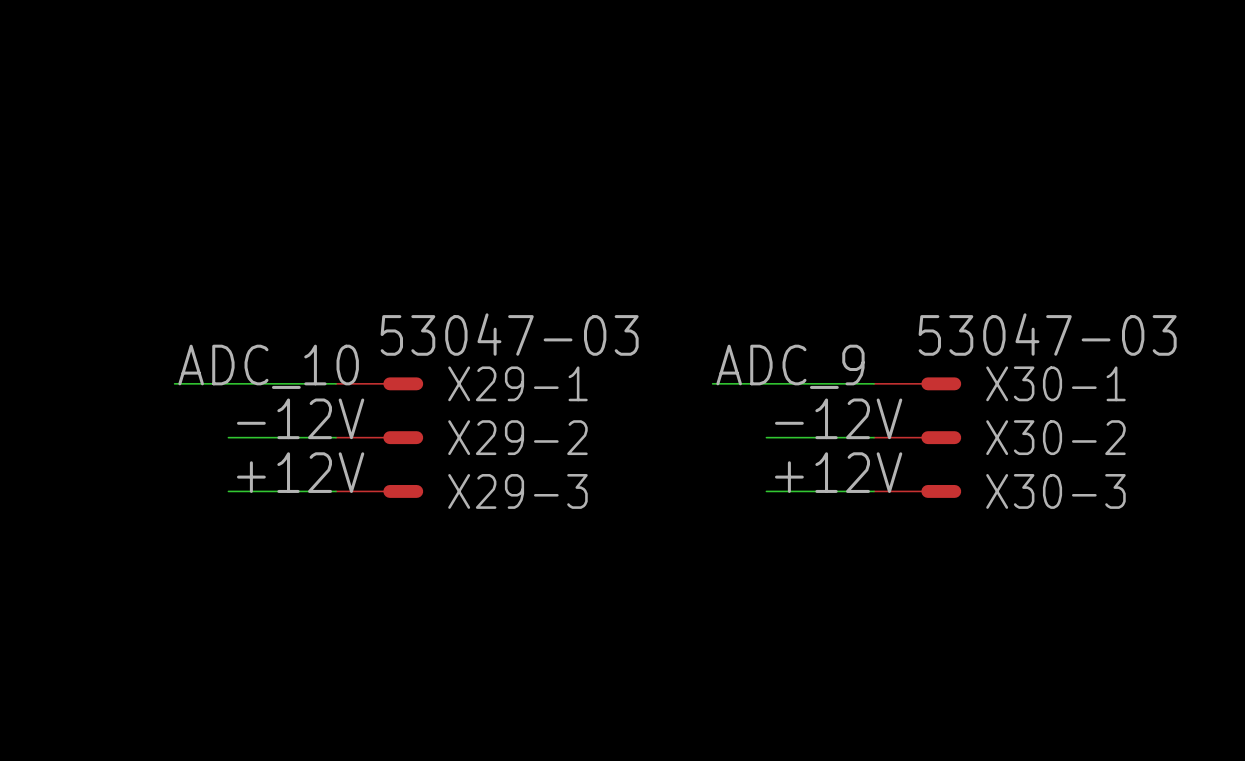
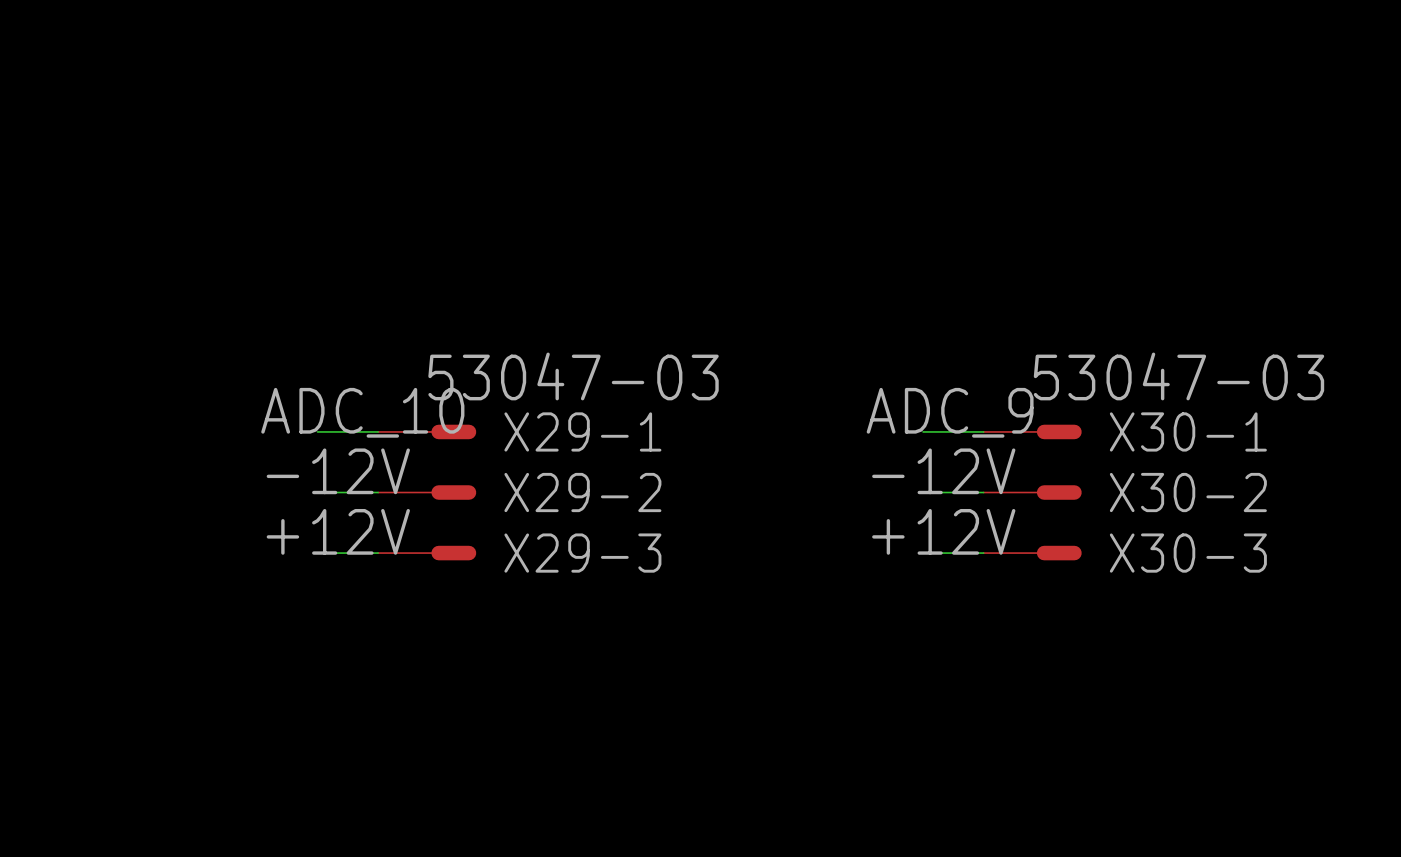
label position: ADC_10 (268, 366) -> ADC_10 (362, 412)
label position: ADC_9 (790, 366) -> ADC_9 (950, 412)
wire: (174, 383) (282, 383) -> none
wire: (712, 383) (820, 383) -> none
wire: (228, 437) (282, 437) -> none
wire: (766, 437) (820, 437) -> none
wire: (228, 491) (282, 491) -> none
wire: (766, 491) (820, 491) -> none

